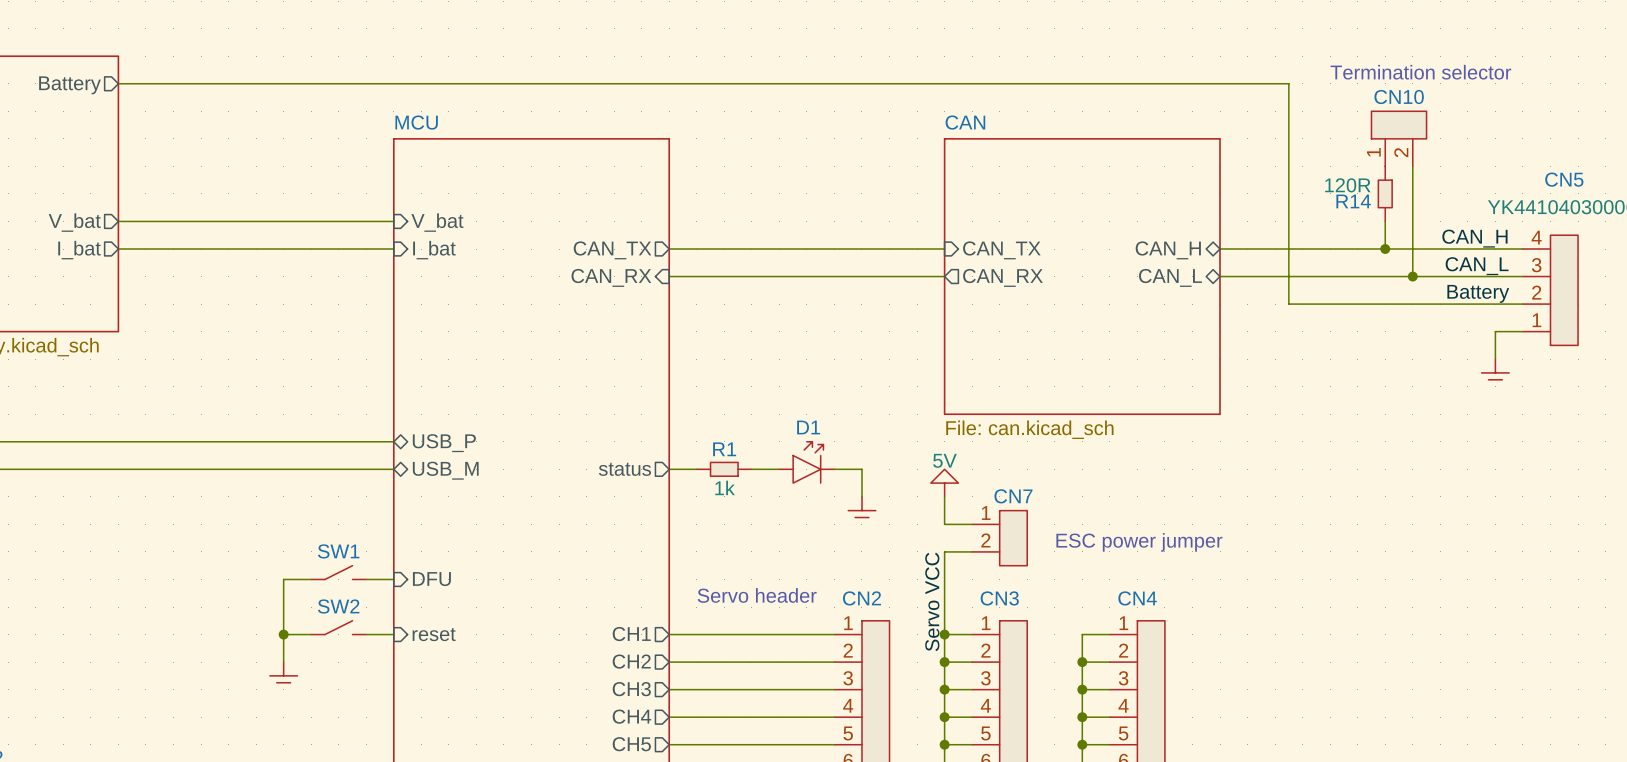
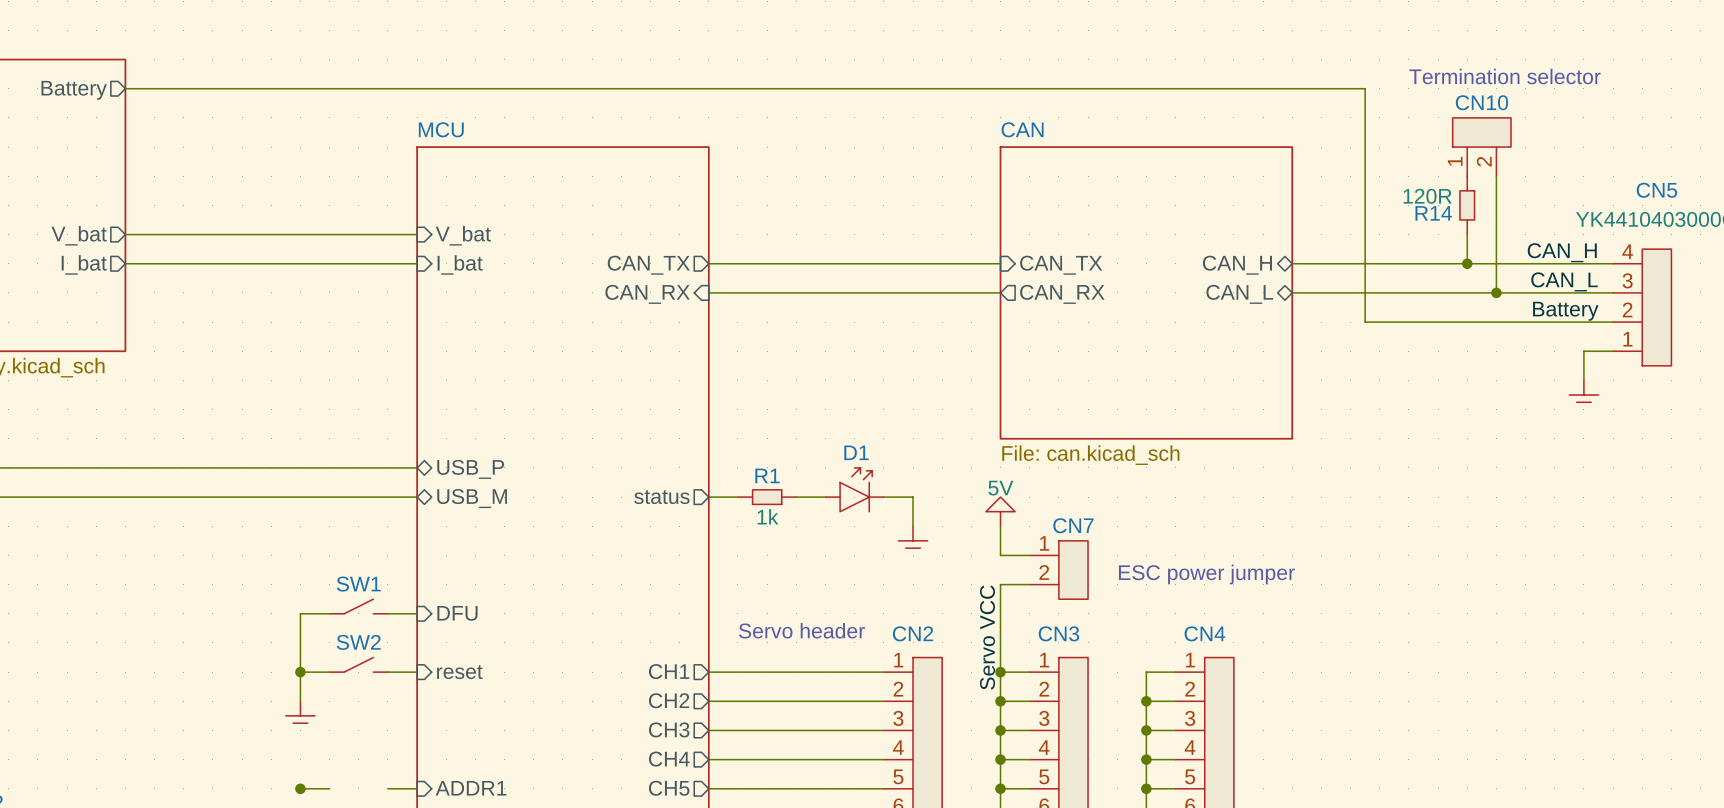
wire: none -> (300, 788) (329, 788)
junction: none -> (300, 788)
wire: none -> (387, 788) (417, 788)
sheet pin: none -> ADDR1 (471, 788)

